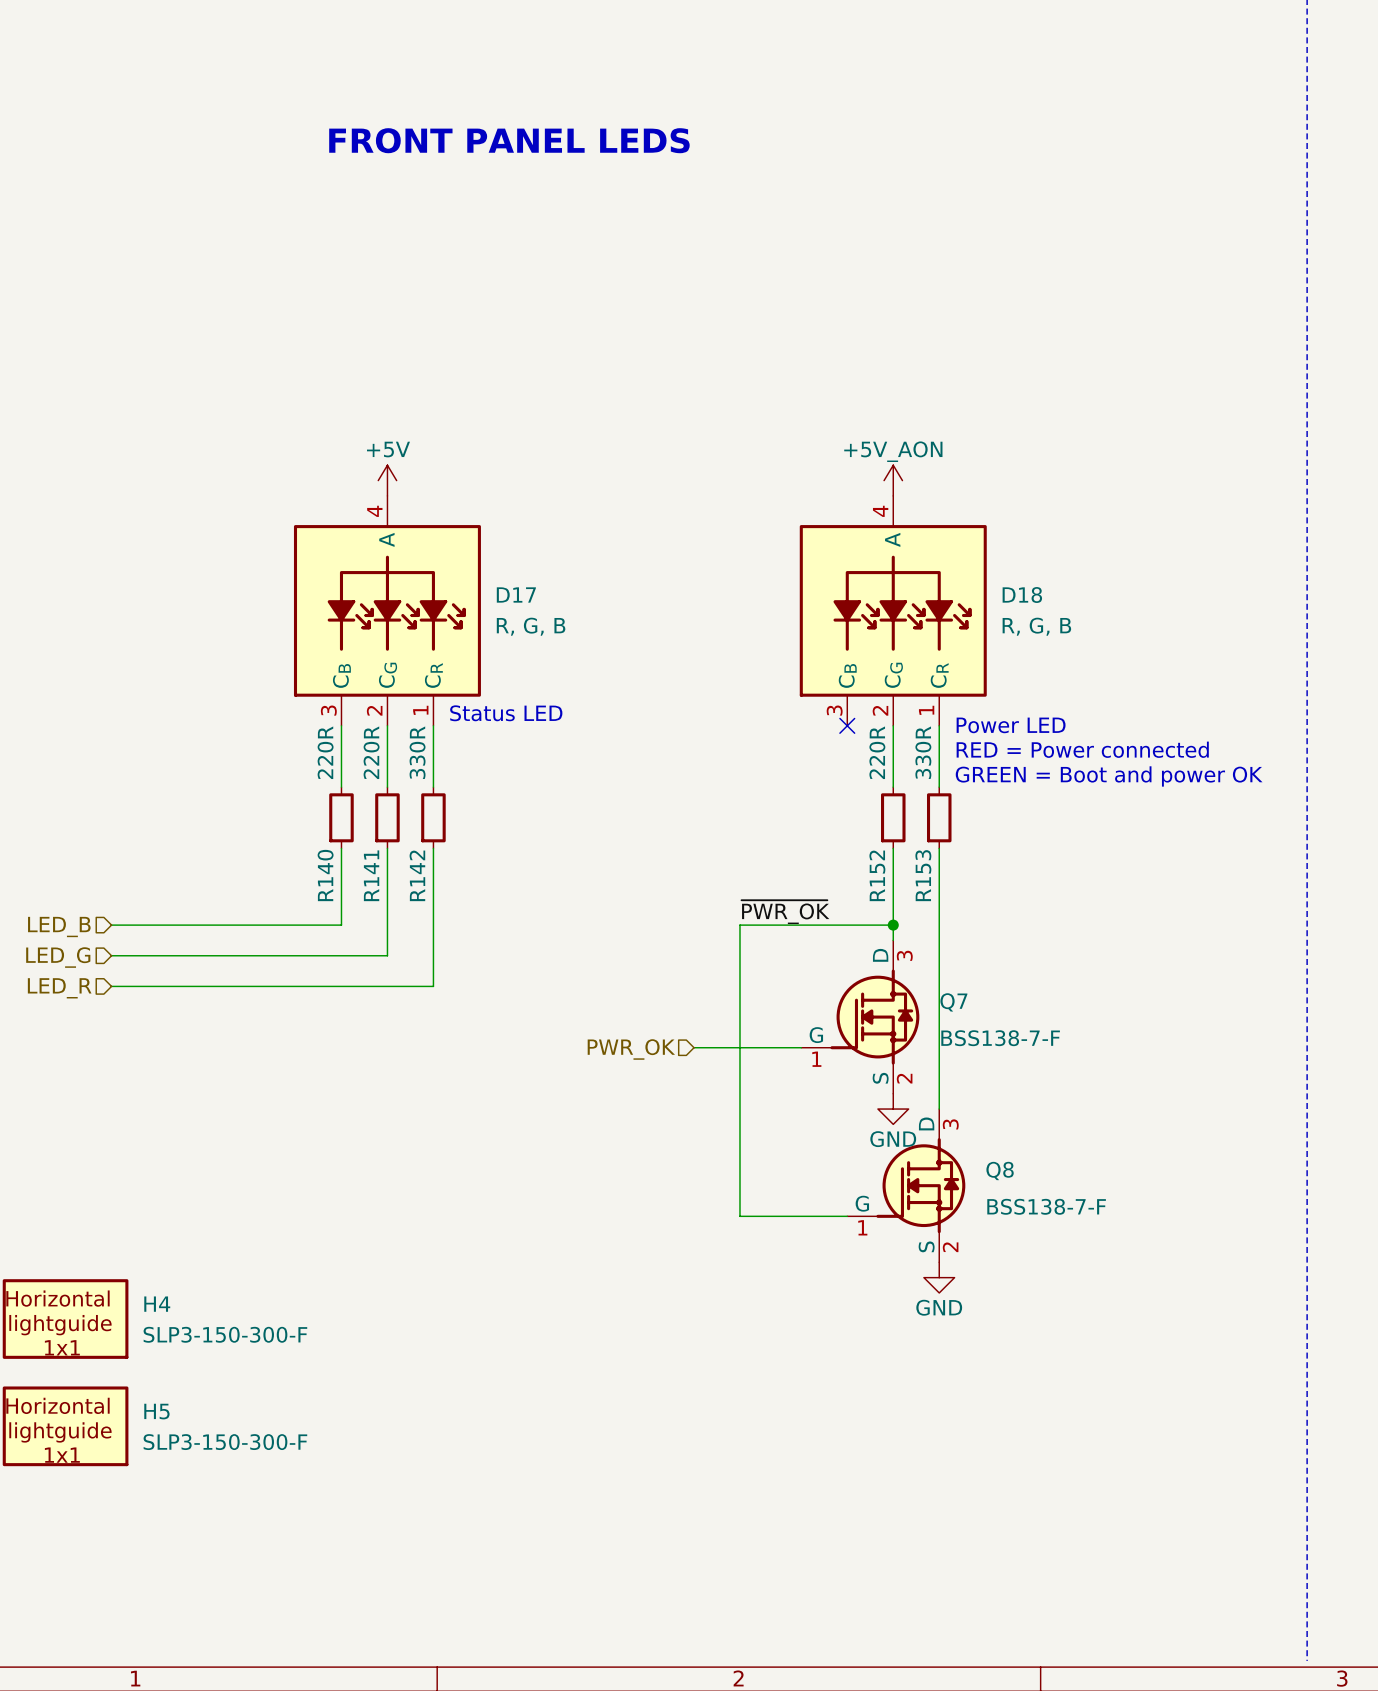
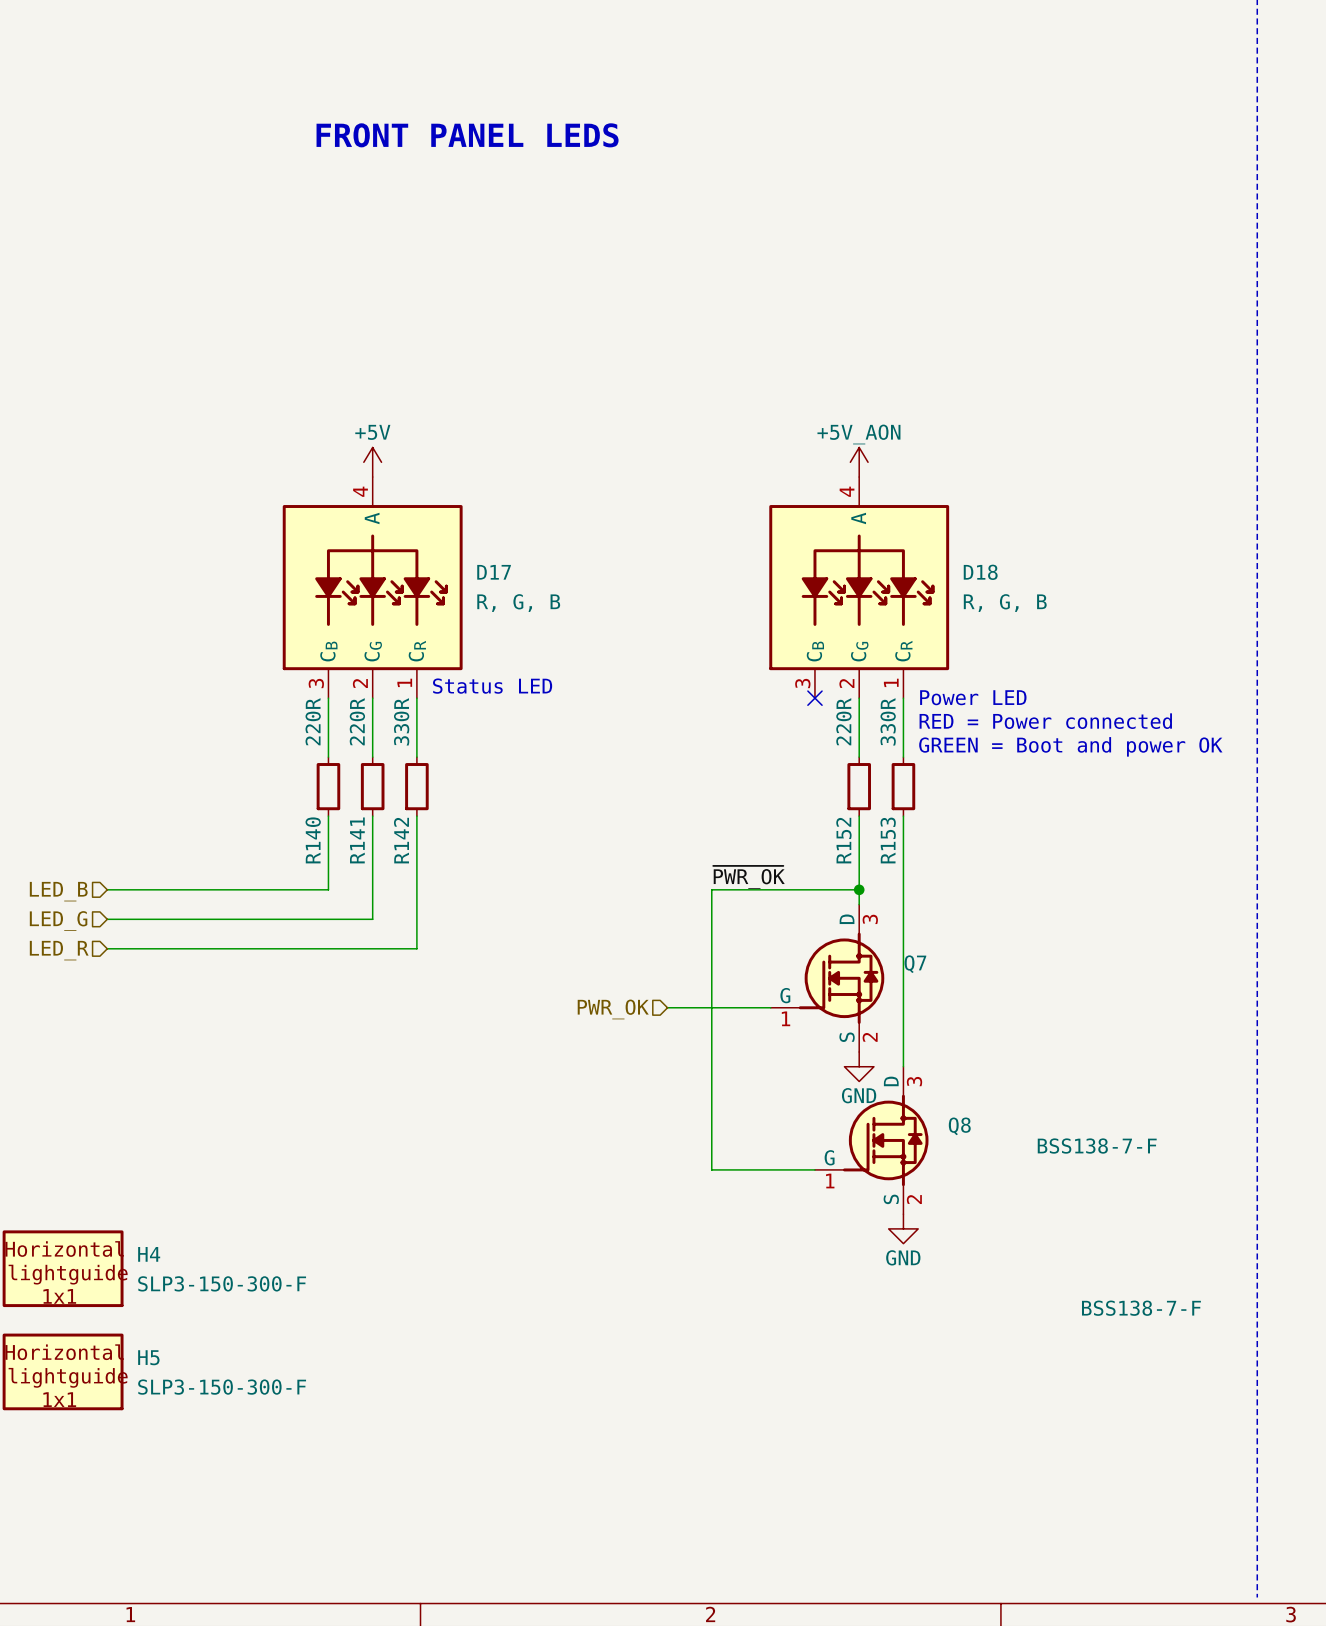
Q7 text position: BSS138-7-F (1000, 1038) -> BSS138-7-F (1097, 1146)
Q8 text position: BSS138-7-F (1046, 1206) -> BSS138-7-F (1141, 1308)

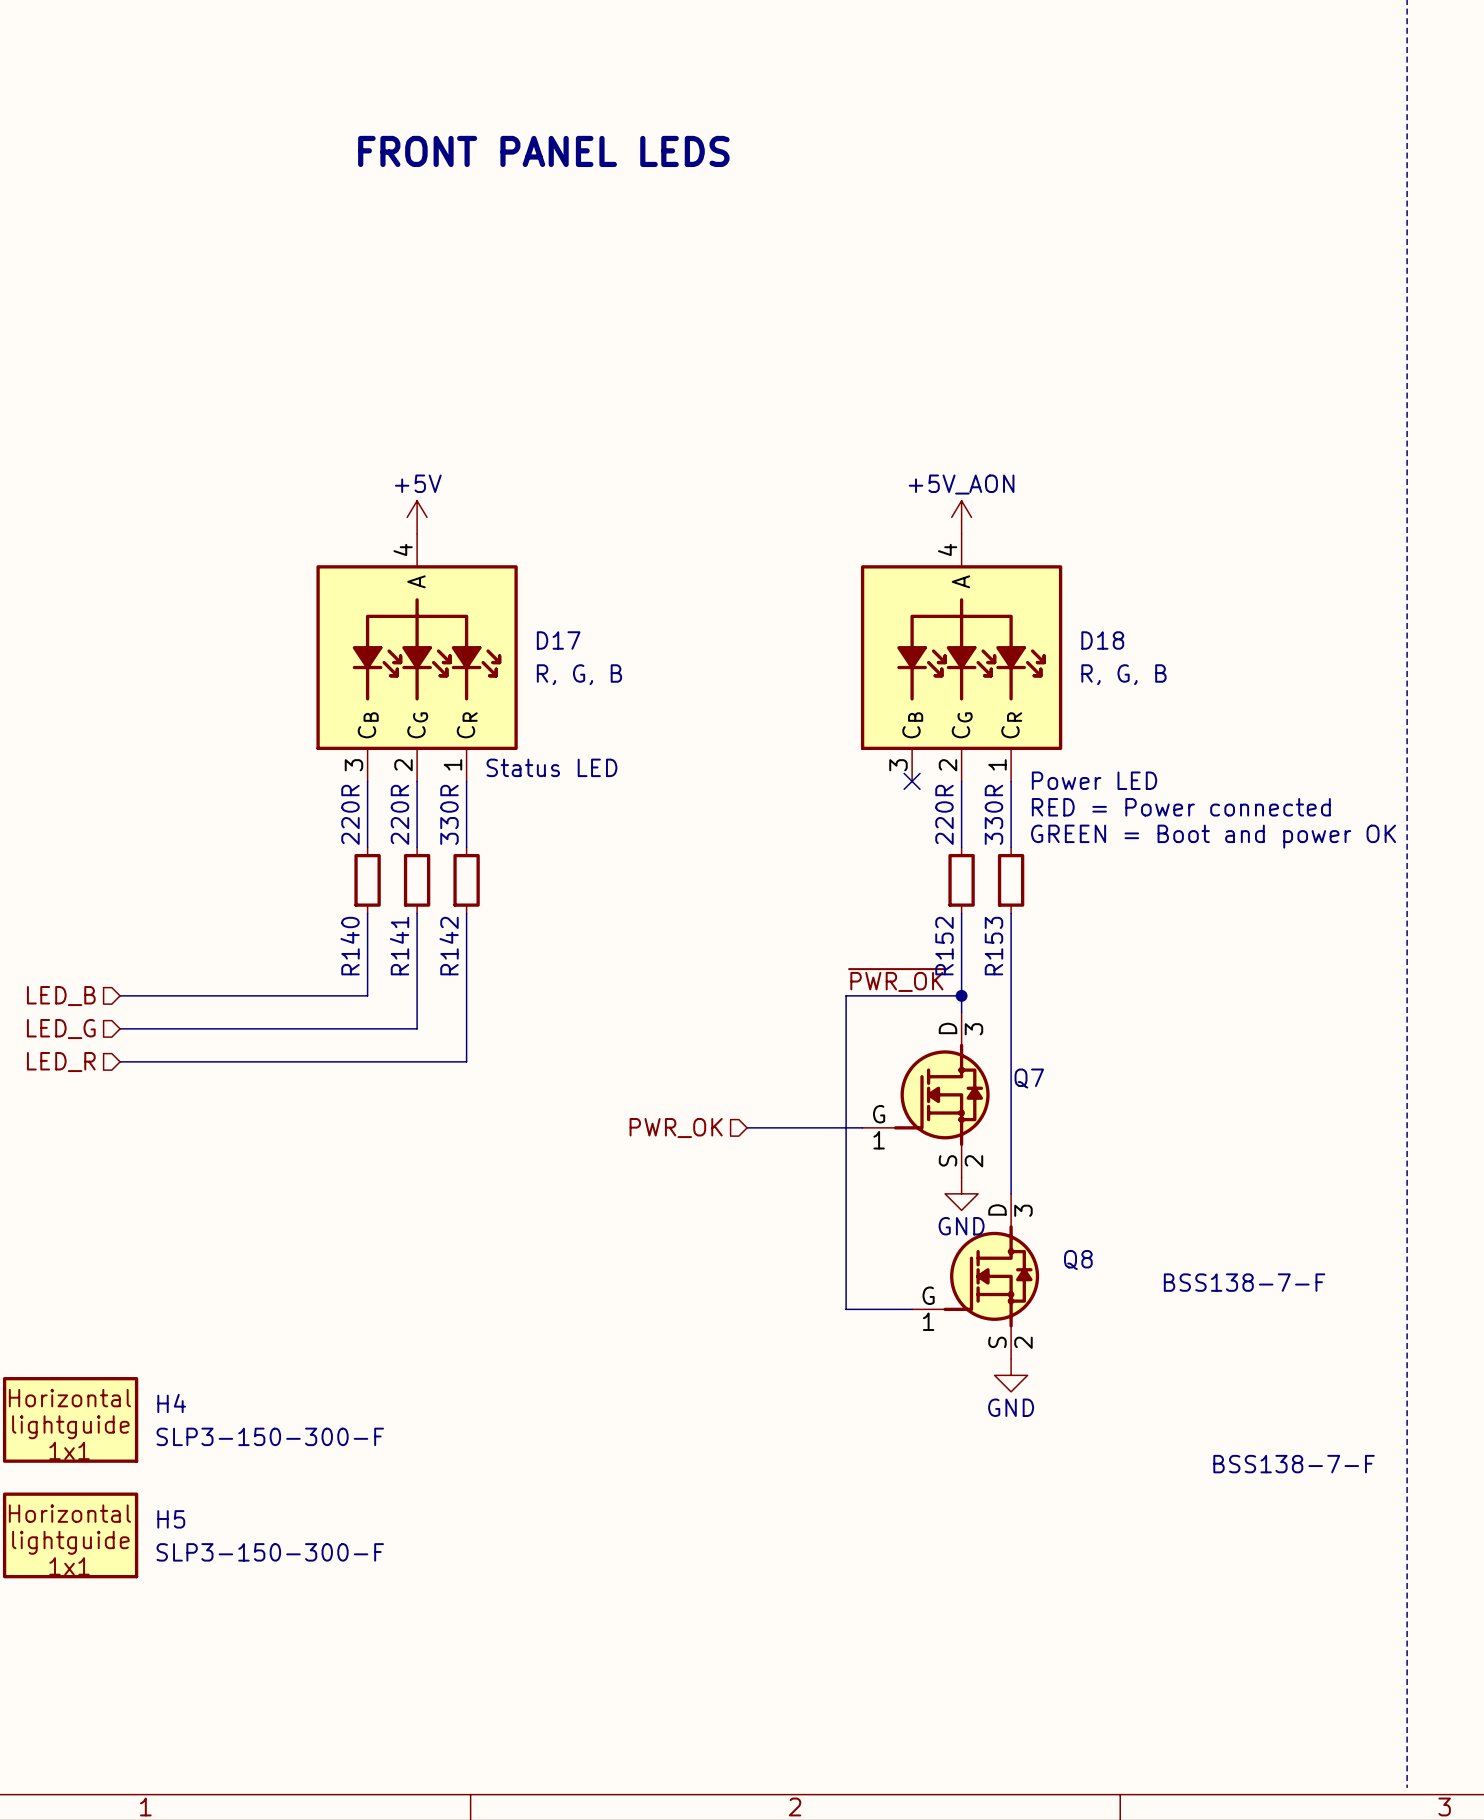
label position: ~{PWR_OK} (748, 877) -> ~{PWR_OK} (896, 980)
wire: (756, 889) (711, 889) (711, 1169) (756, 1169) -> (846, 995) (846, 1309)

